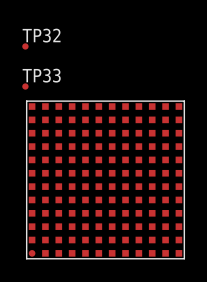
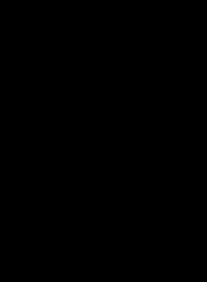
TP32: (25, 46) -> none
TP33: (25, 86) -> none
part: (105, 179) -> none

